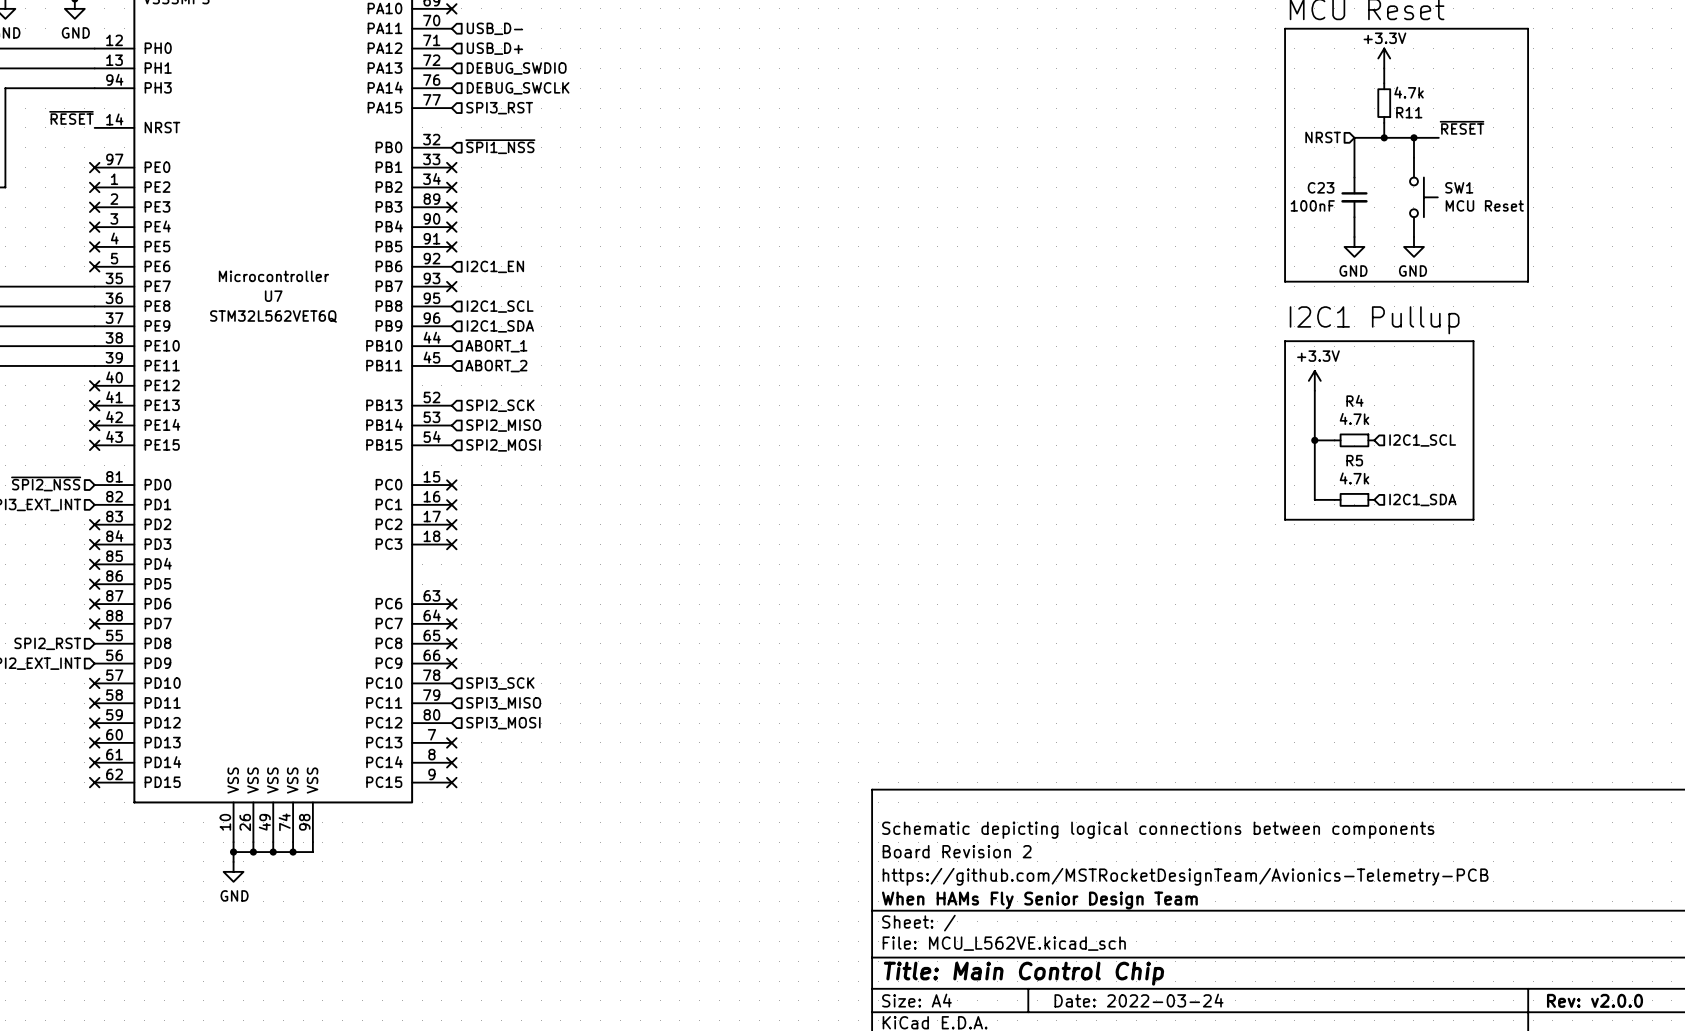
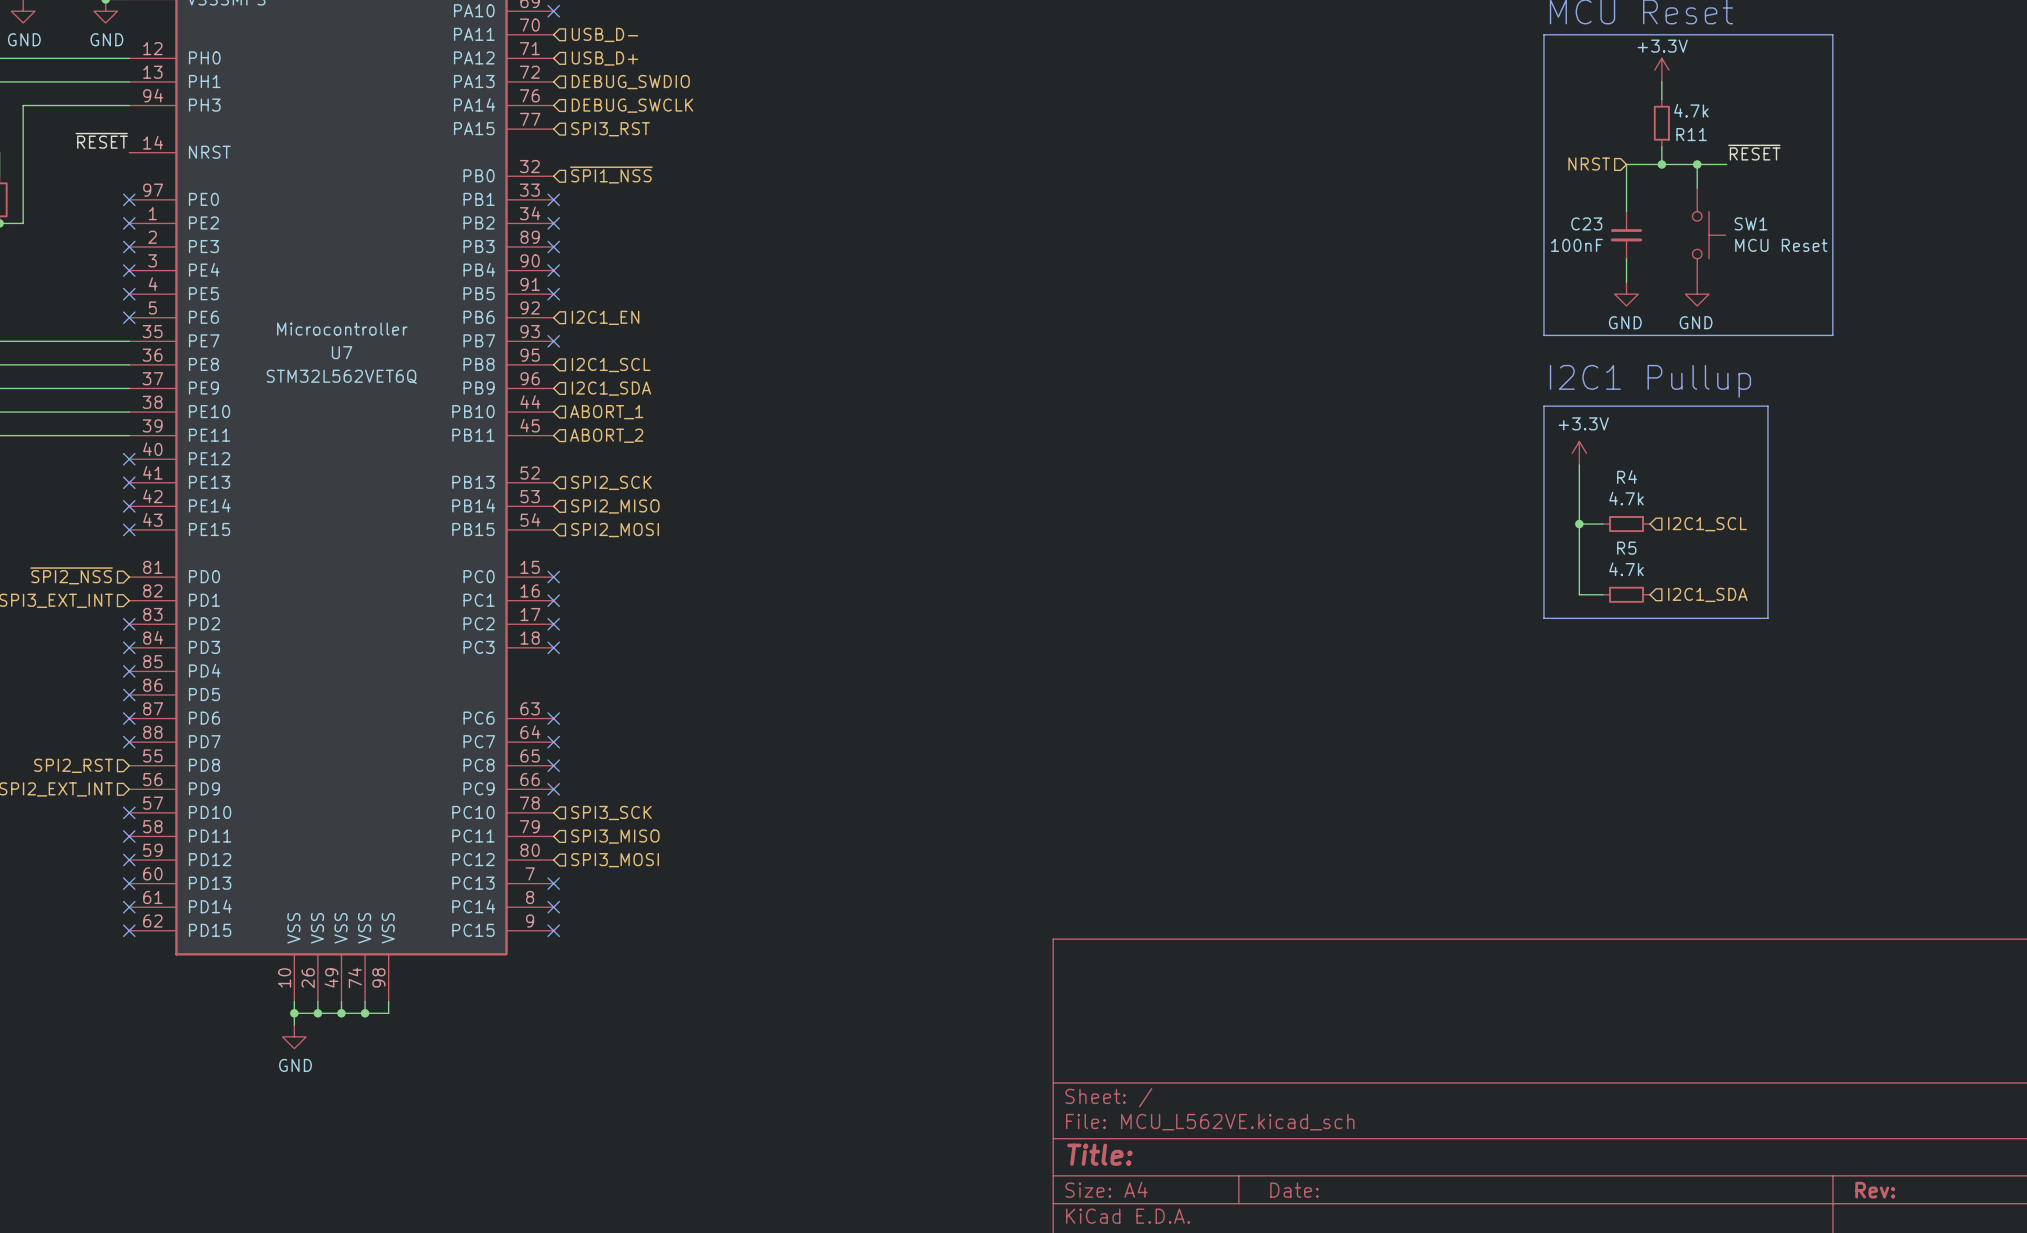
title block: Schematic depicting logical connections between components (1158, 830) -> none
title block: Board Revision 2 (957, 851) -> none
title block: https://github.com/MSTRocketDesignTeam/Avionics-Telemetry-PCB (1185, 876) -> none
title block: When HAMs Fly Senior Design Team (1039, 900) -> none
title block: Title: Main Control Chip (1023, 973) -> Title: (1099, 1154)
title block: Date: 2022-03-24 (1138, 1000) -> Date: (1294, 1190)
title block: Rev: v2.0.0 (1595, 1000) -> Rev: (1875, 1190)

